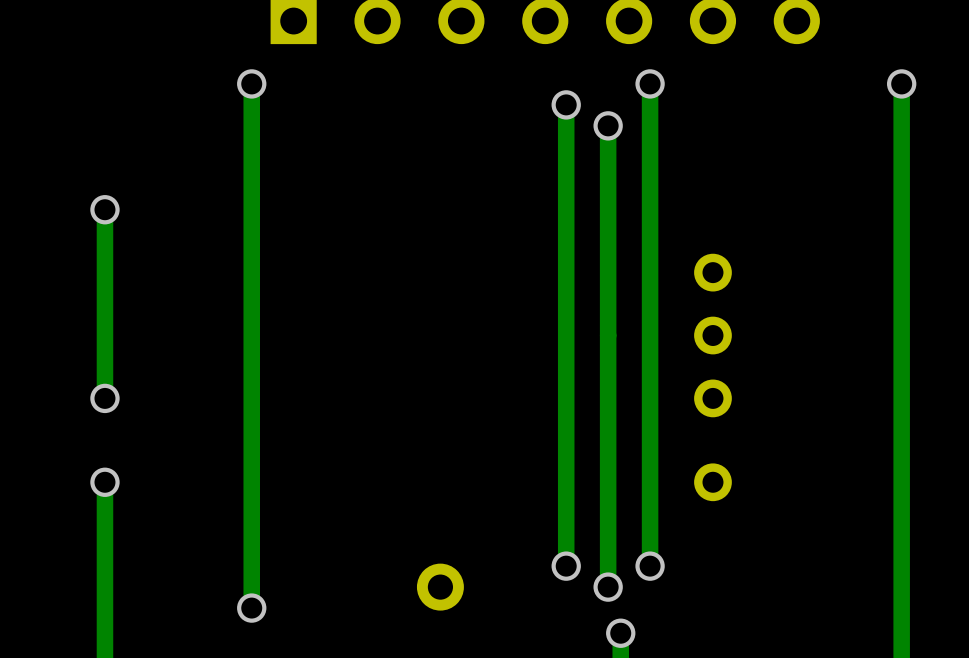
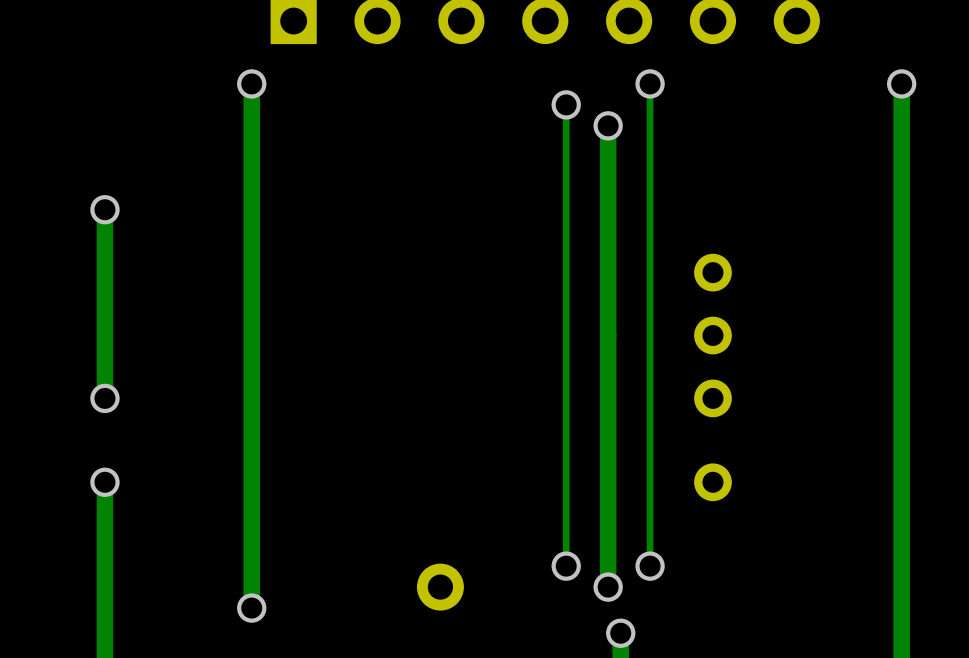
track width: thick (650, 83) (650, 566) -> thin (650, 83) (650, 566)
track width: thick (566, 104) (566, 566) -> thin (566, 104) (566, 566)

